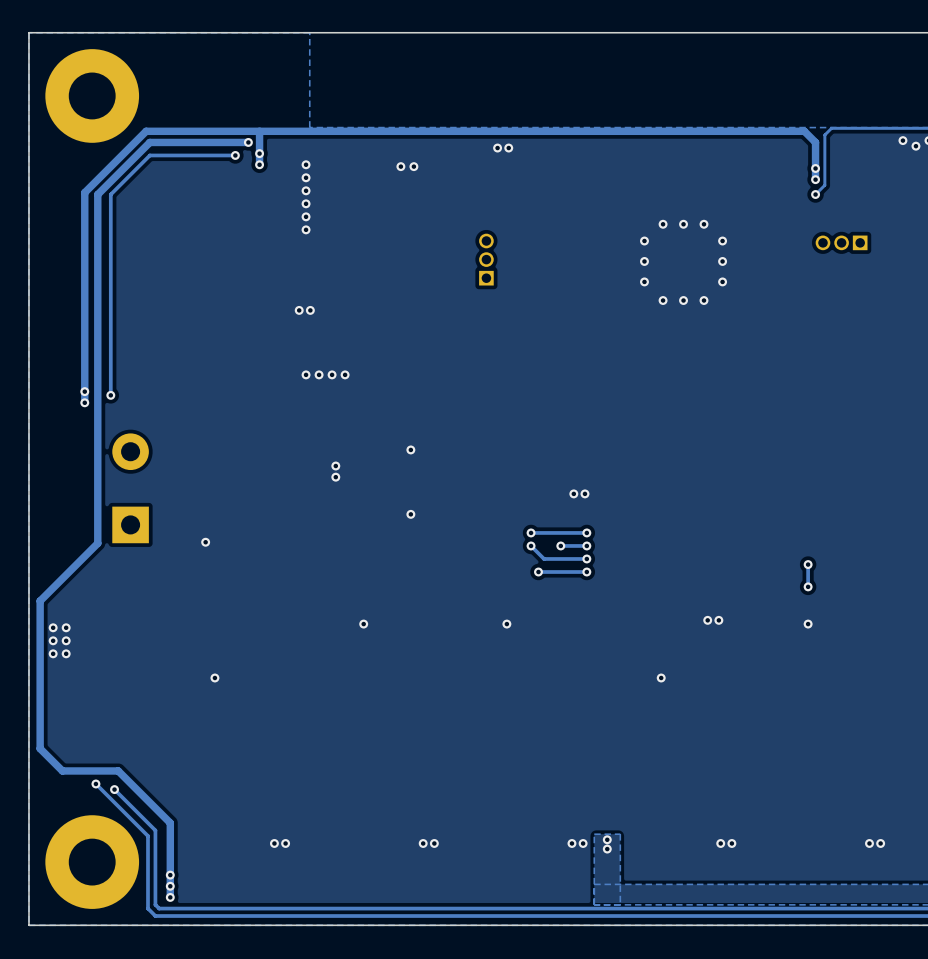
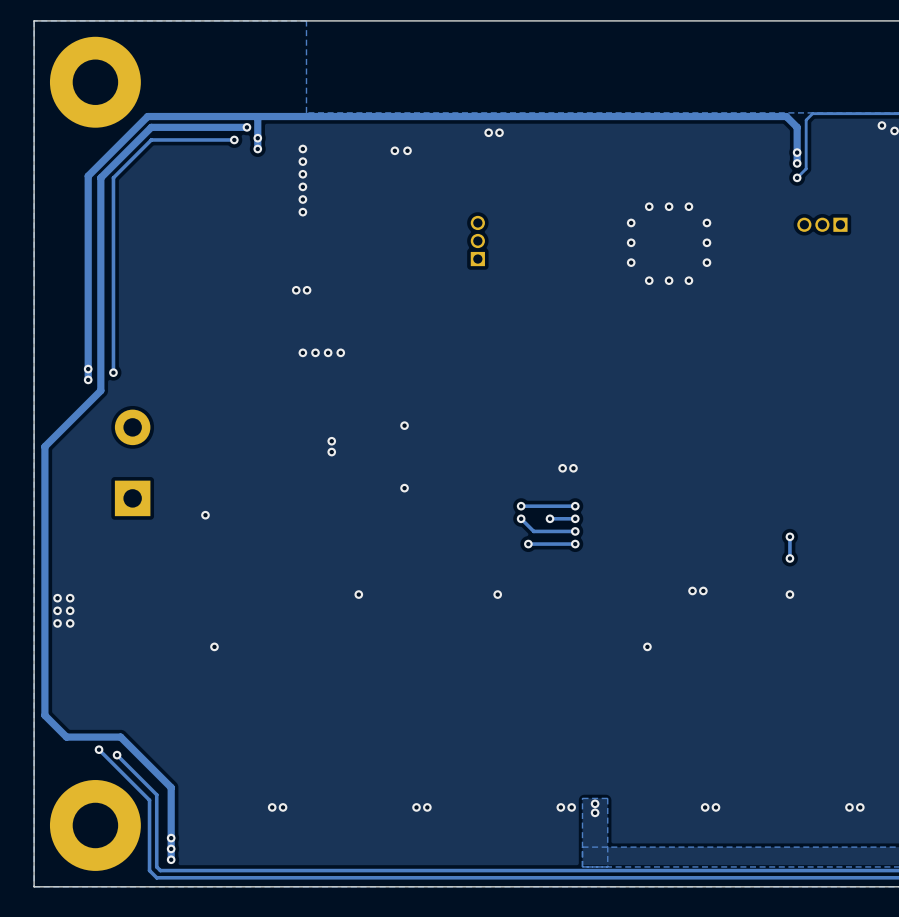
track: (97, 413) (97, 543) (40, 601) -> (100, 390) (44, 446) (44, 572)

